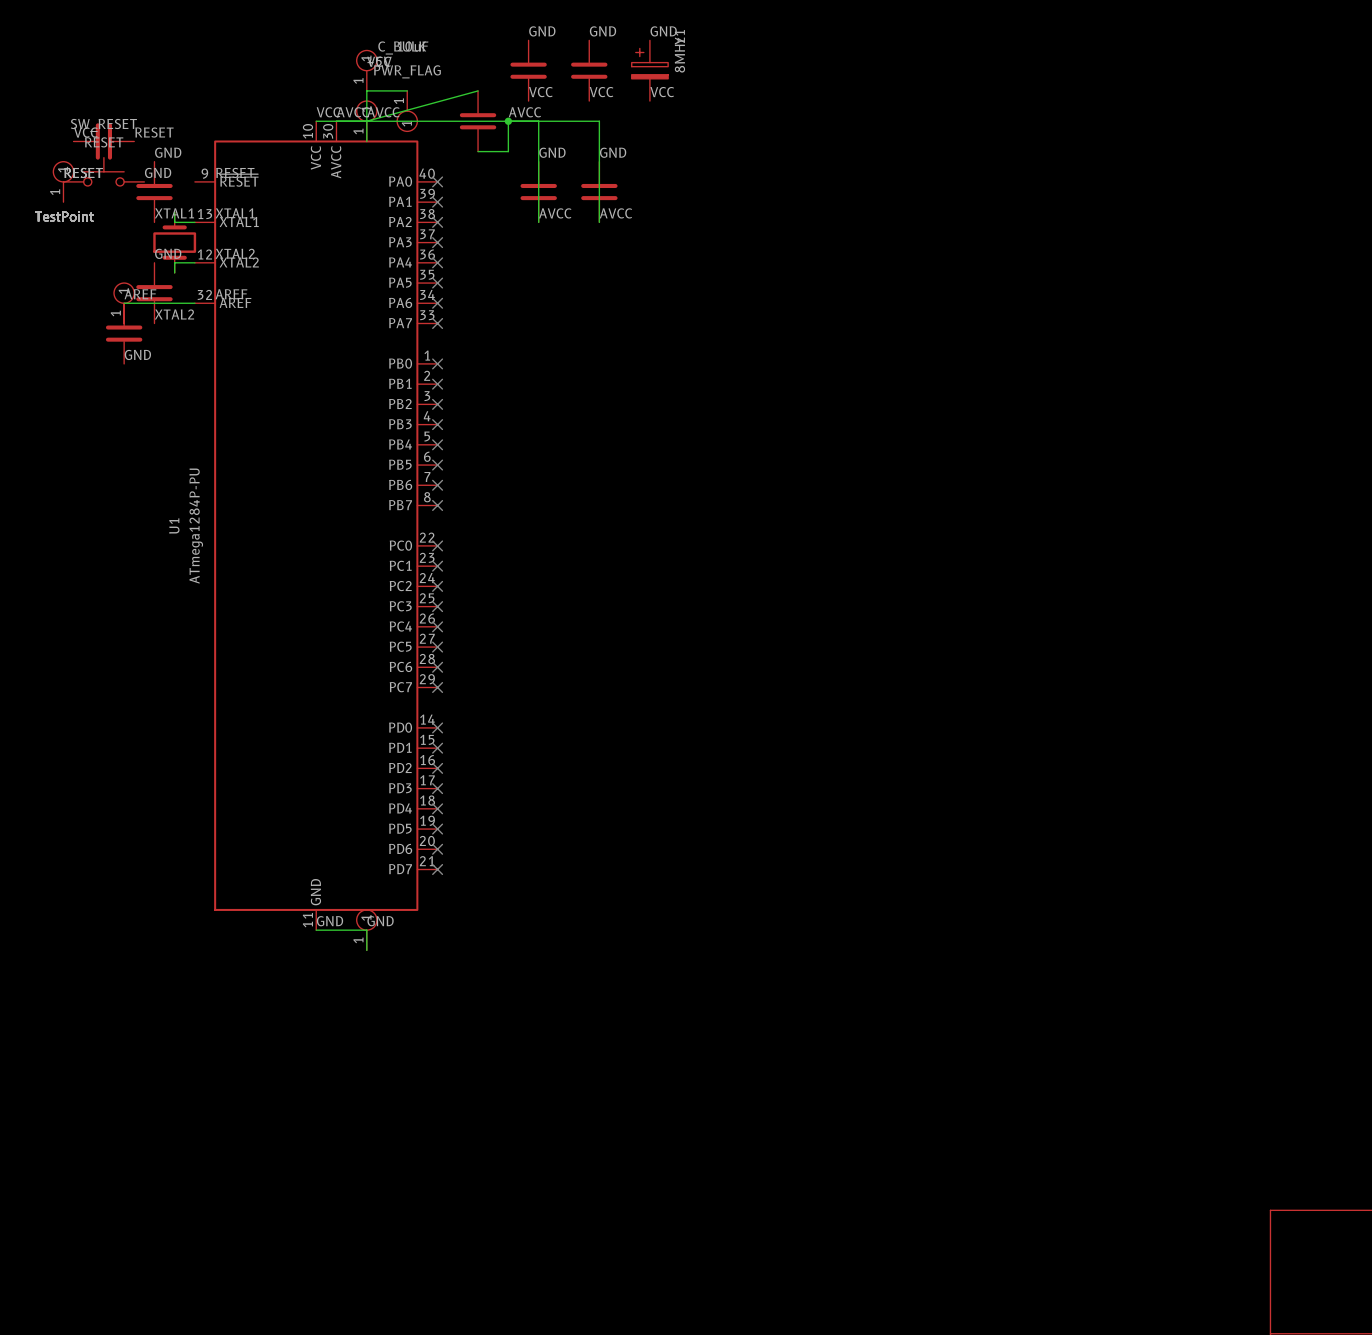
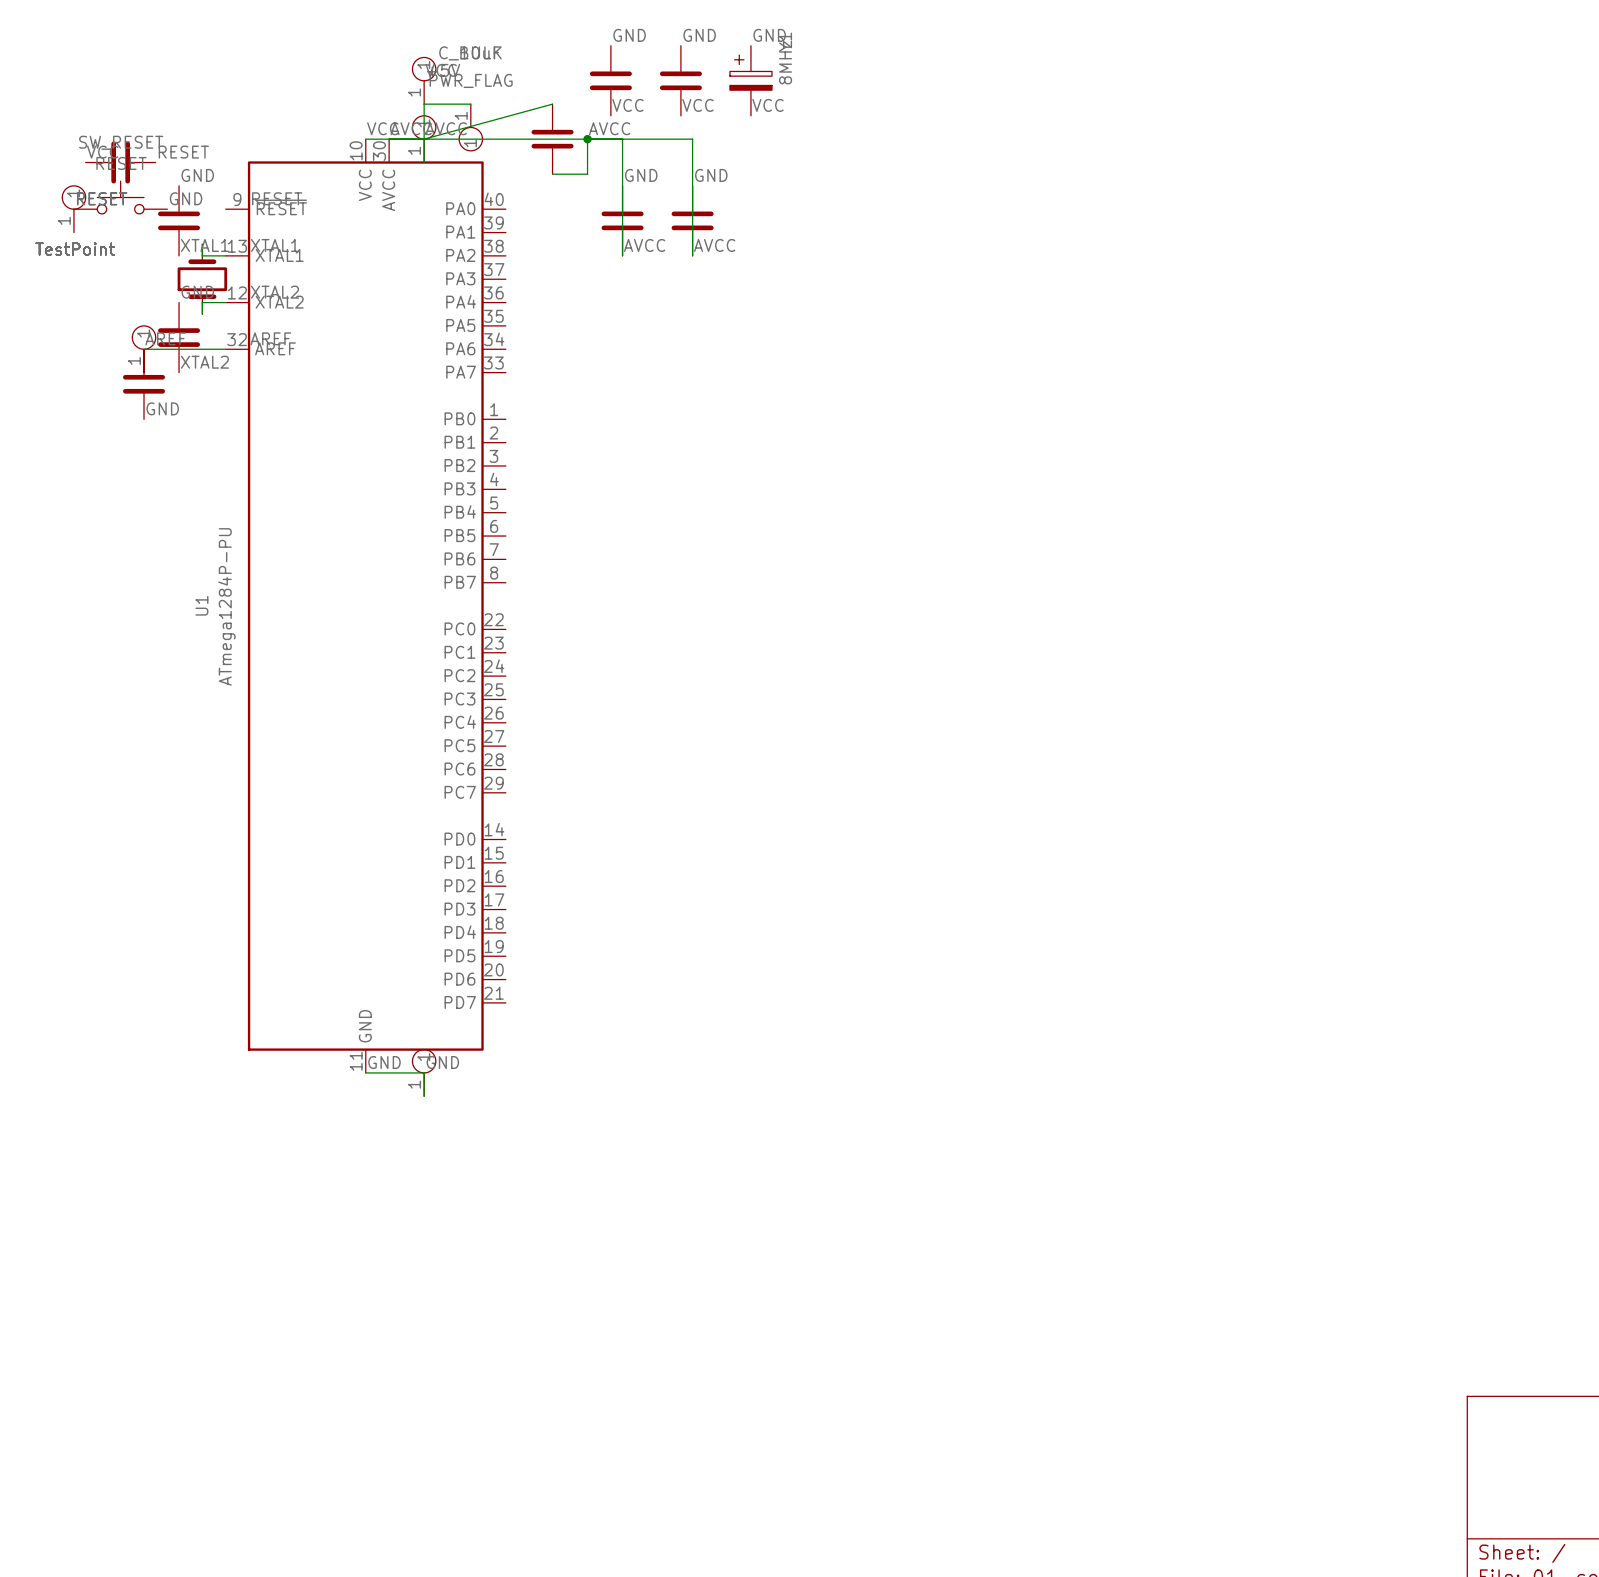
no-connect mark: (437, 181) -> none
no-connect mark: (437, 202) -> none
no-connect mark: (437, 222) -> none
no-connect mark: (437, 242) -> none
no-connect mark: (437, 262) -> none
no-connect mark: (437, 283) -> none
no-connect mark: (437, 303) -> none
no-connect mark: (437, 323) -> none
no-connect mark: (437, 363) -> none
no-connect mark: (437, 384) -> none
no-connect mark: (437, 404) -> none
no-connect mark: (437, 424) -> none
no-connect mark: (437, 444) -> none
no-connect mark: (437, 465) -> none
no-connect mark: (437, 485) -> none
no-connect mark: (437, 505) -> none
no-connect mark: (437, 545) -> none
no-connect mark: (437, 566) -> none
no-connect mark: (437, 586) -> none
no-connect mark: (437, 606) -> none
no-connect mark: (437, 626) -> none
no-connect mark: (437, 647) -> none
no-connect mark: (437, 667) -> none
no-connect mark: (437, 687) -> none
no-connect mark: (437, 727) -> none
no-connect mark: (437, 748) -> none
no-connect mark: (437, 768) -> none
no-connect mark: (437, 788) -> none
no-connect mark: (437, 808) -> none
no-connect mark: (437, 829) -> none
no-connect mark: (437, 849) -> none
no-connect mark: (437, 869) -> none

